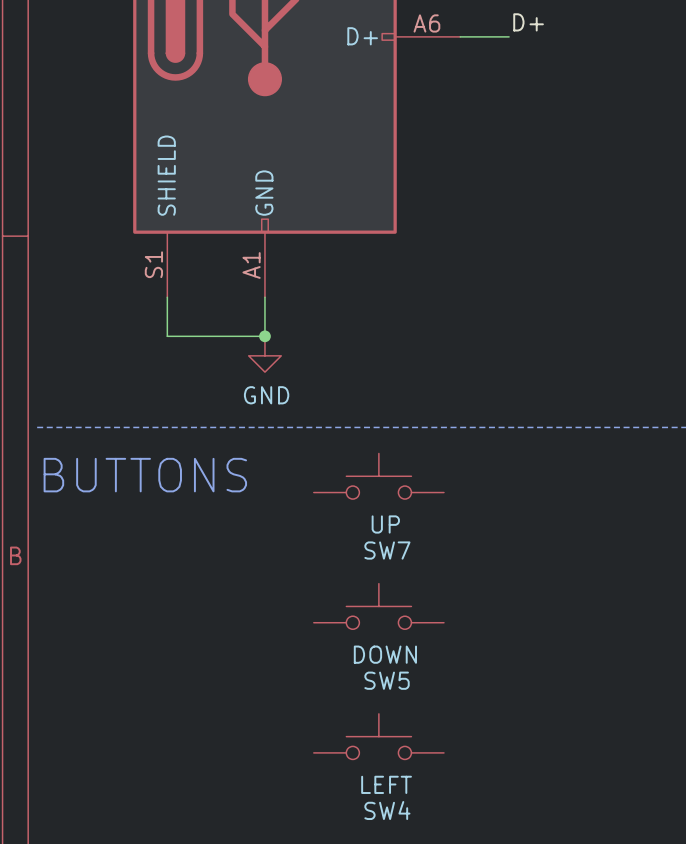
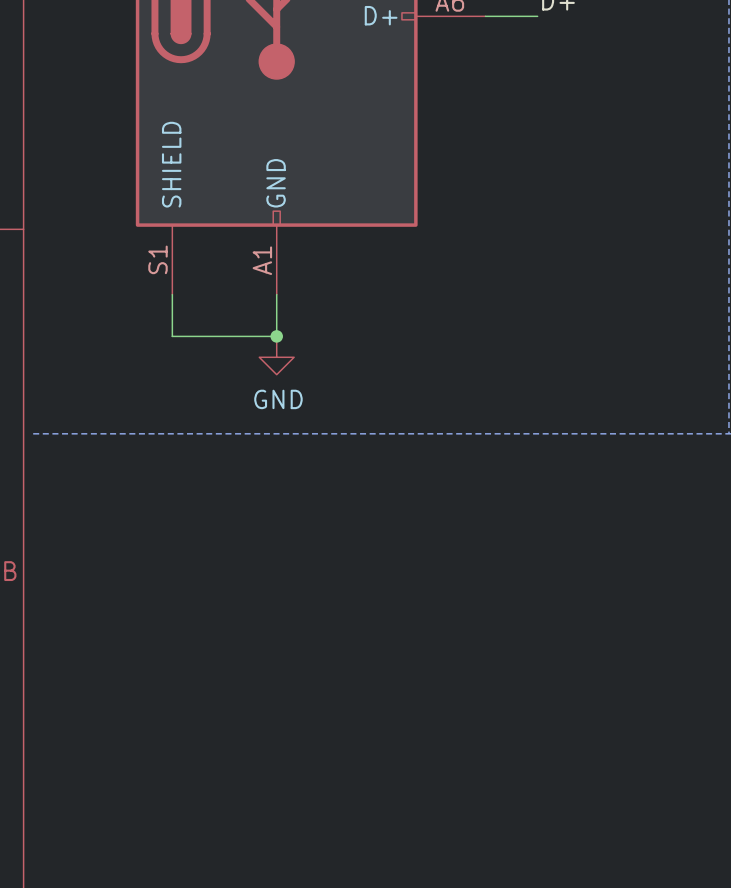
text: BUTTONS (145, 475) -> none
SW7: UP (378, 476) -> none
SW5: DOWN (378, 606) -> none
SW4: LEFT (378, 736) -> none

